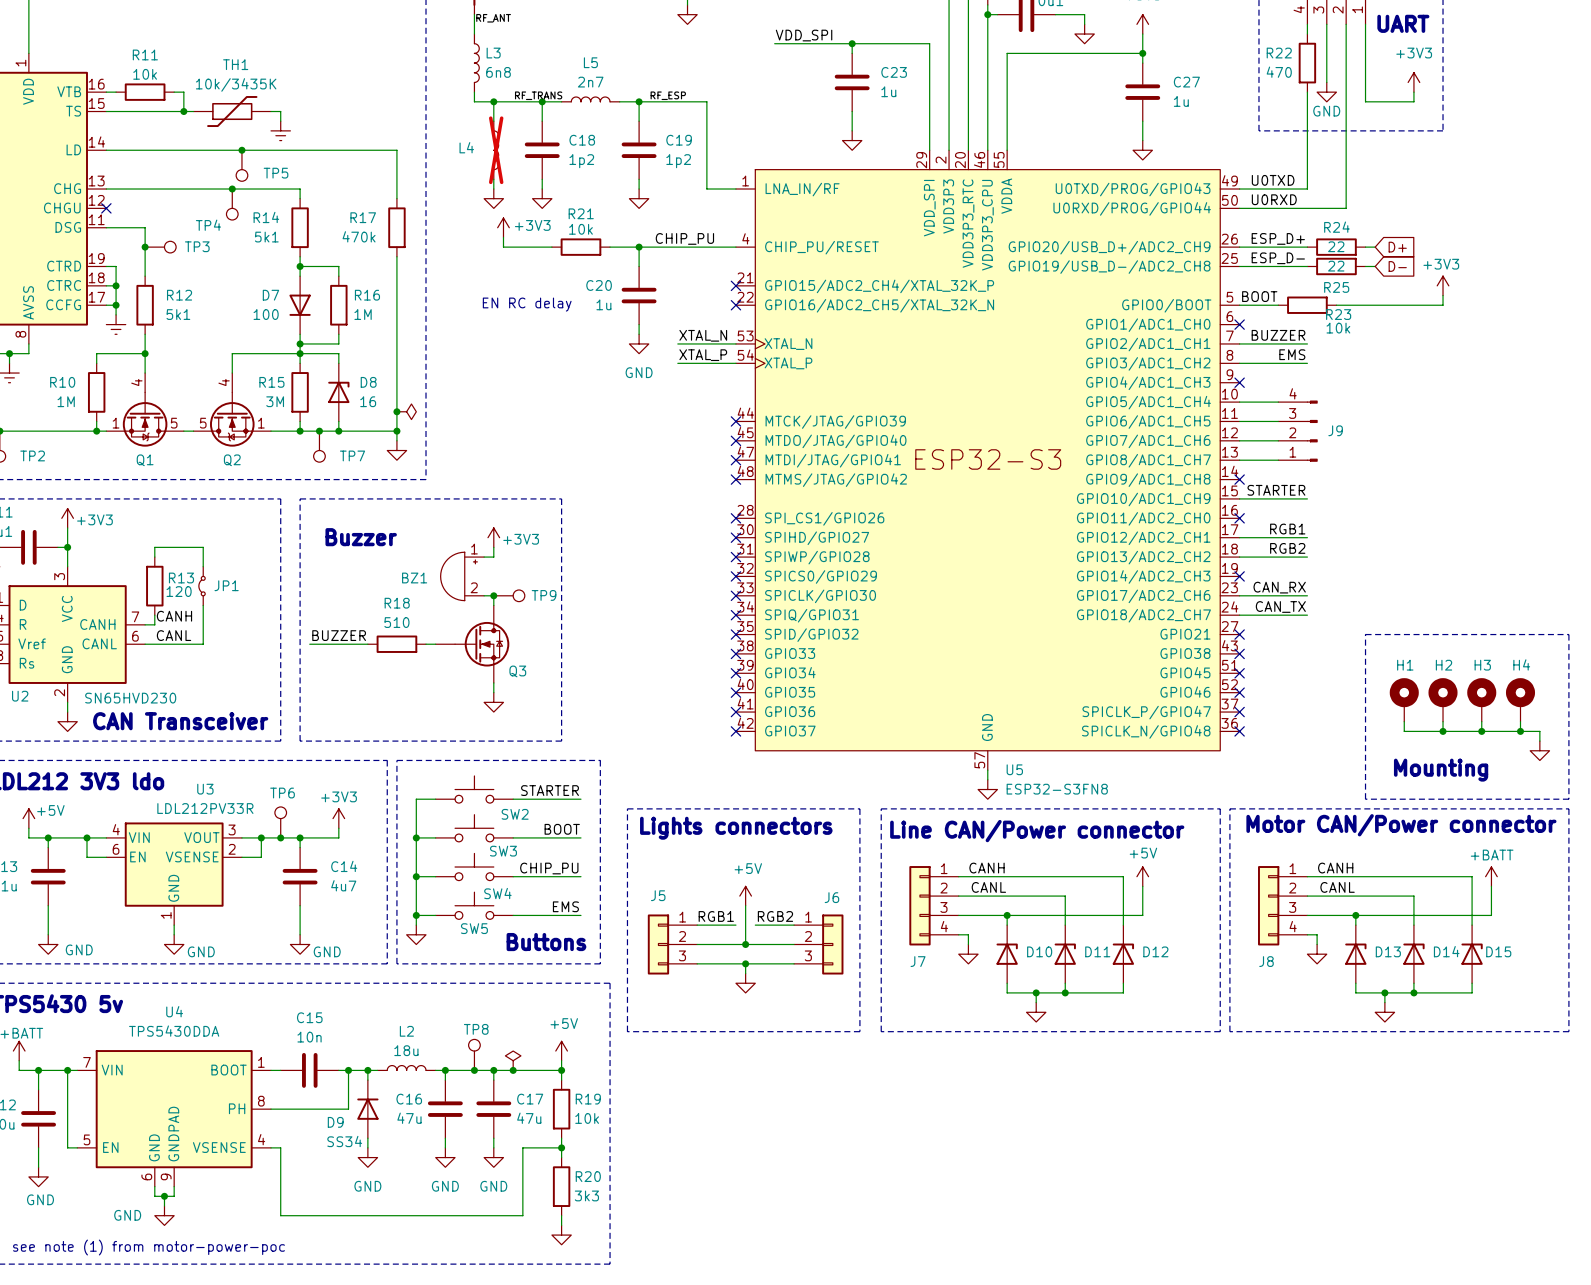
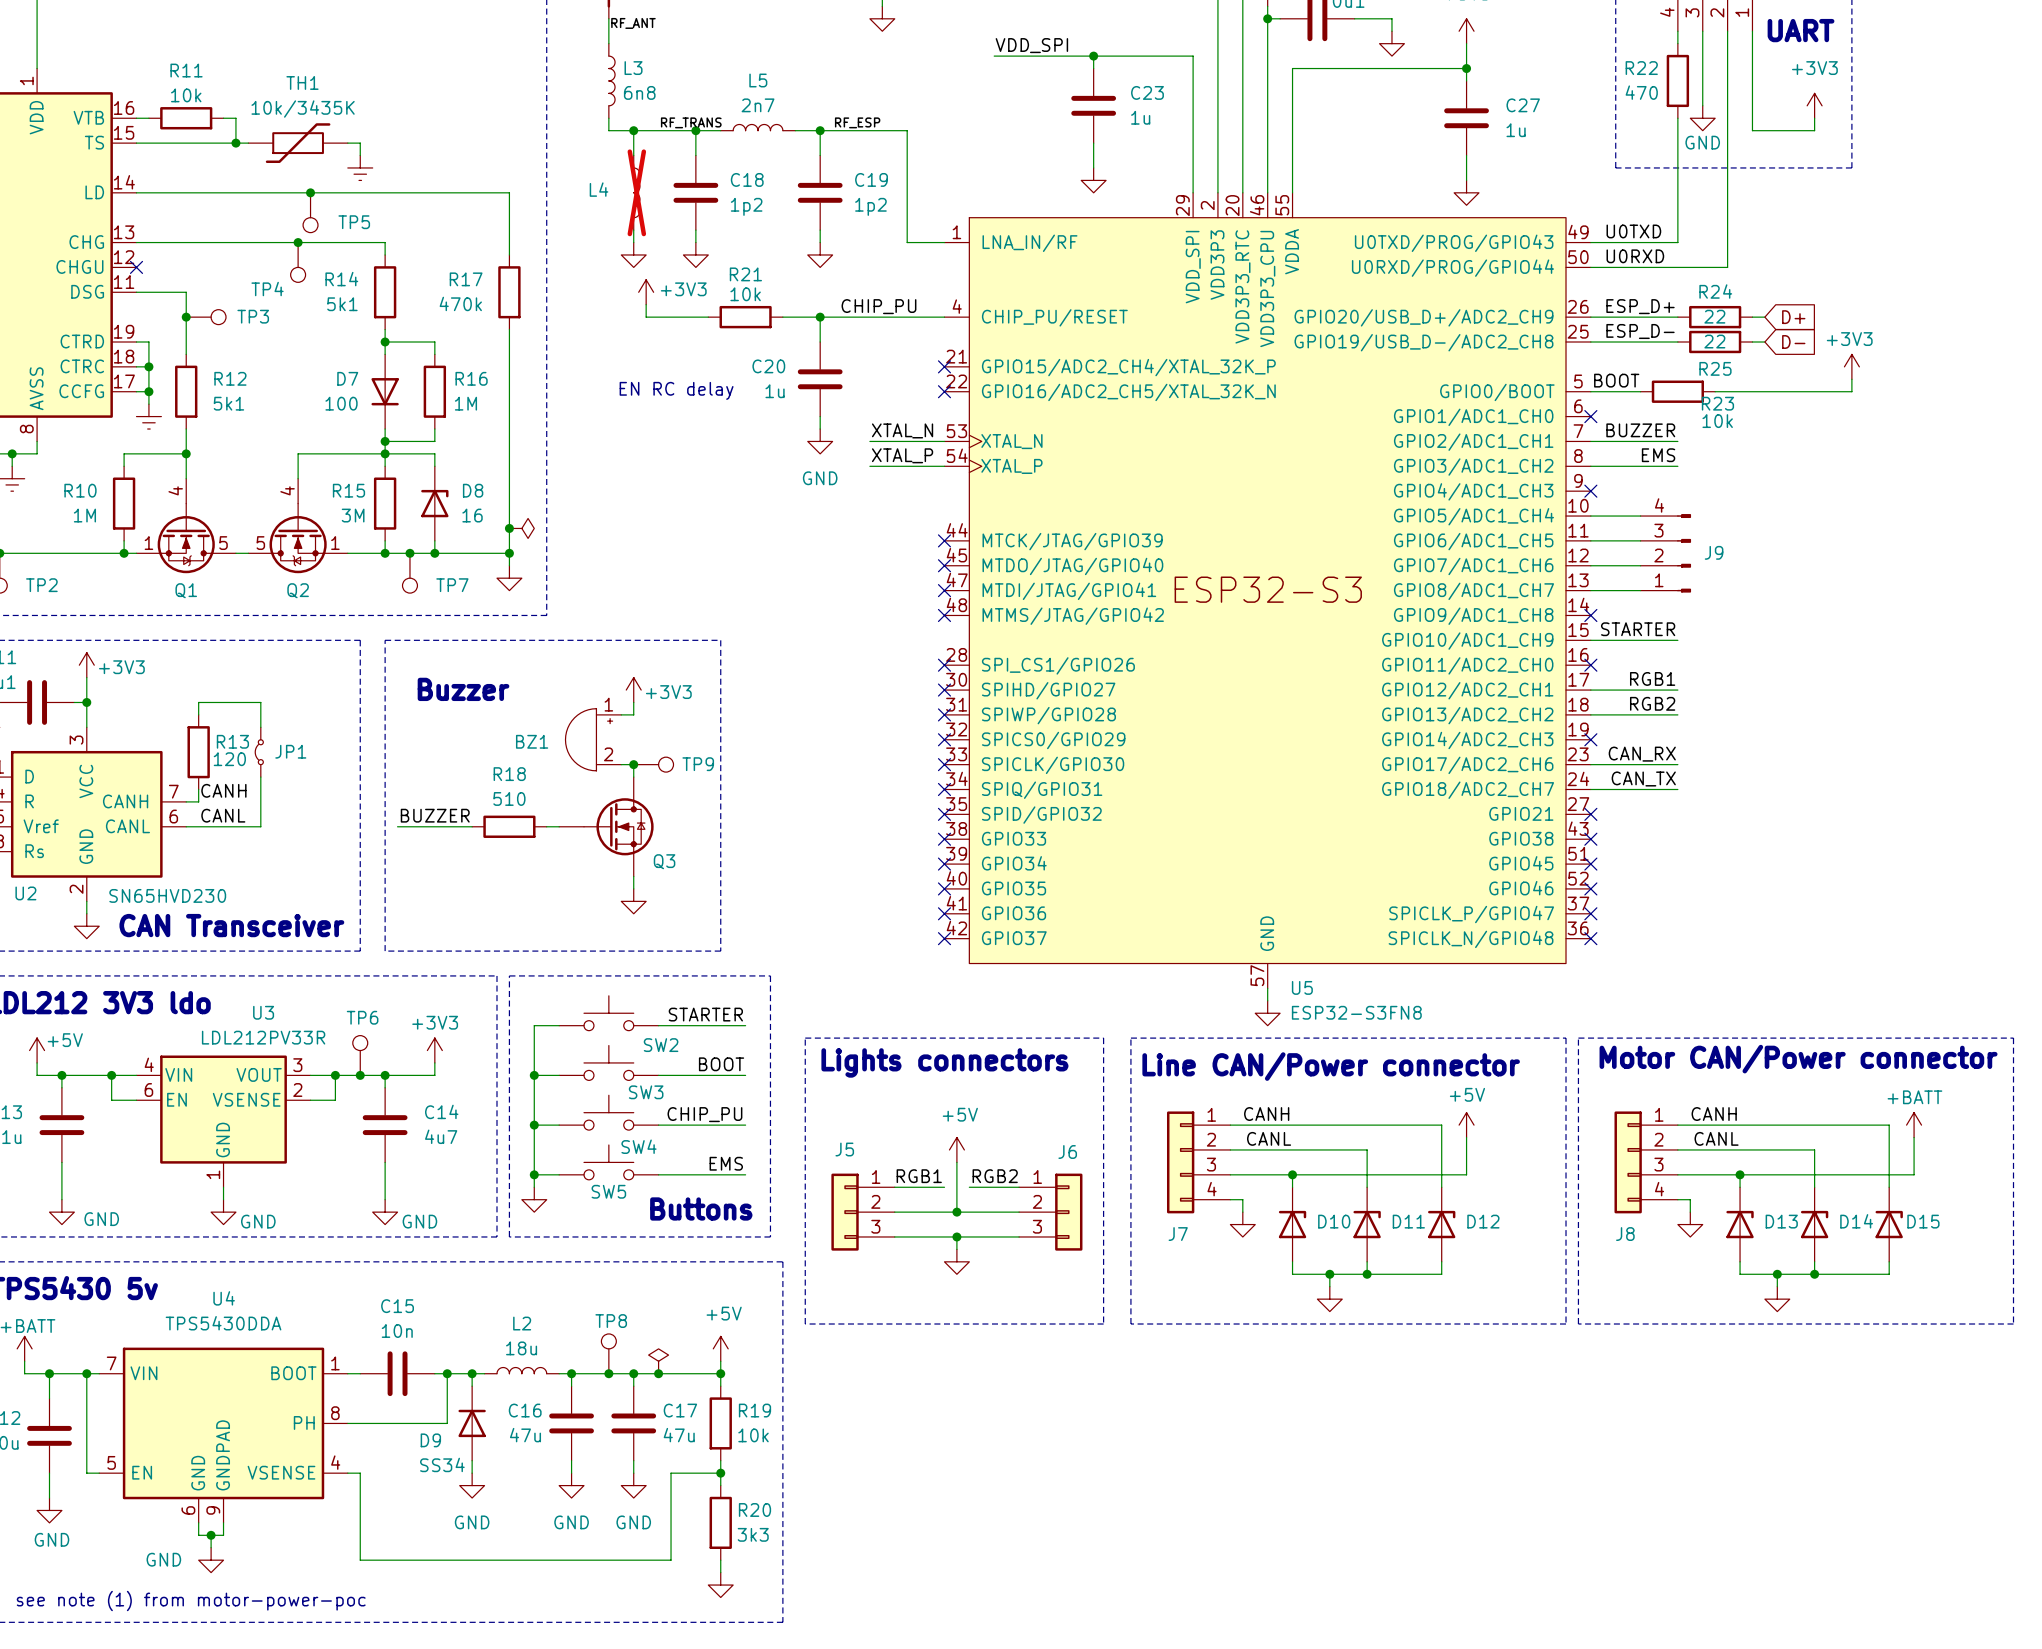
line: (1365, 634) (1568, 634) (1568, 799) (1365, 799) (1365, 634) -> none
H1: (1404, 699) -> none
H2: (1443, 699) -> none
H3: (1481, 699) -> none
H4: (1520, 699) -> none
wire: (1404, 721) (1404, 731) (1539, 731) (1539, 741) -> none
wire: (1443, 721) (1443, 731) -> none
wire: (1481, 721) (1481, 731) -> none
wire: (1520, 721) (1520, 731) -> none
junction: (1443, 731) -> none
junction: (1481, 731) -> none
junction: (1520, 731) -> none
power symbol: (1539, 750) -> none
text: Mounting (1441, 770) -> none

